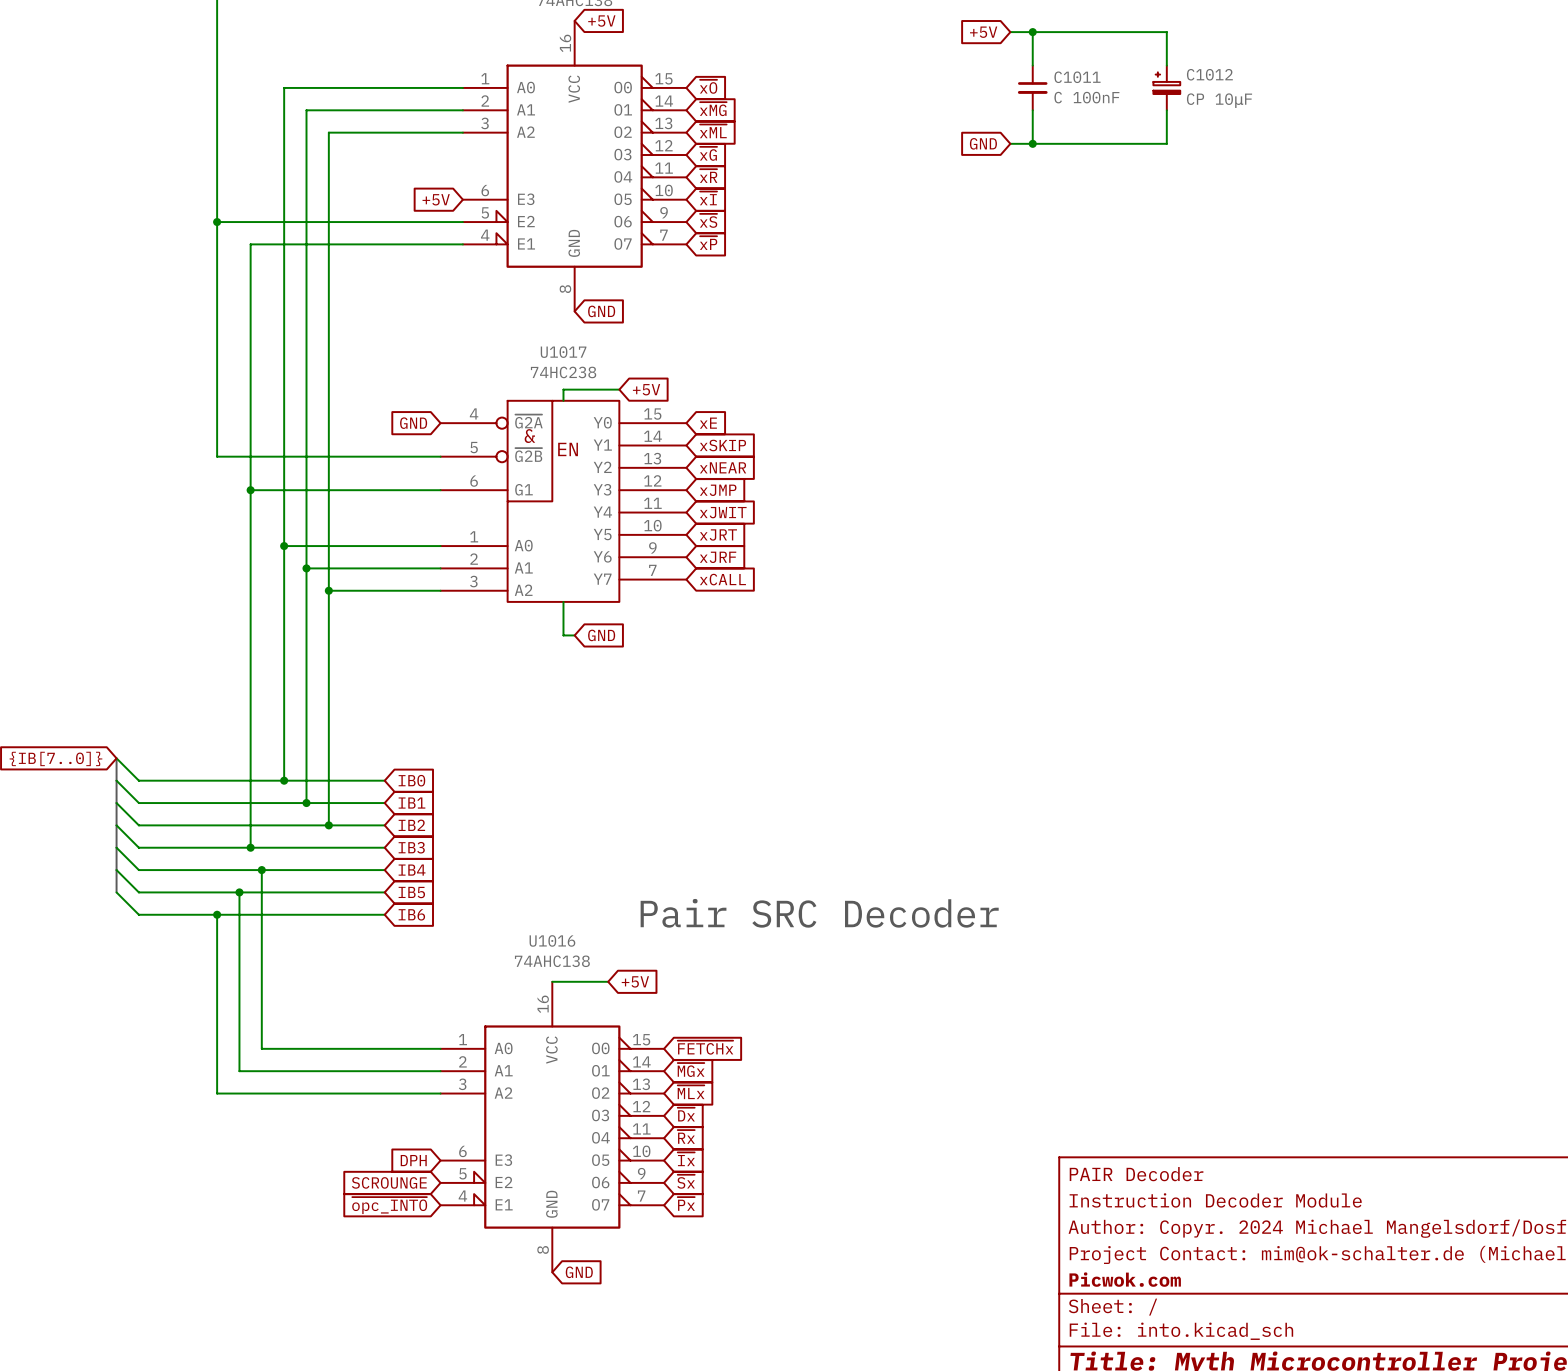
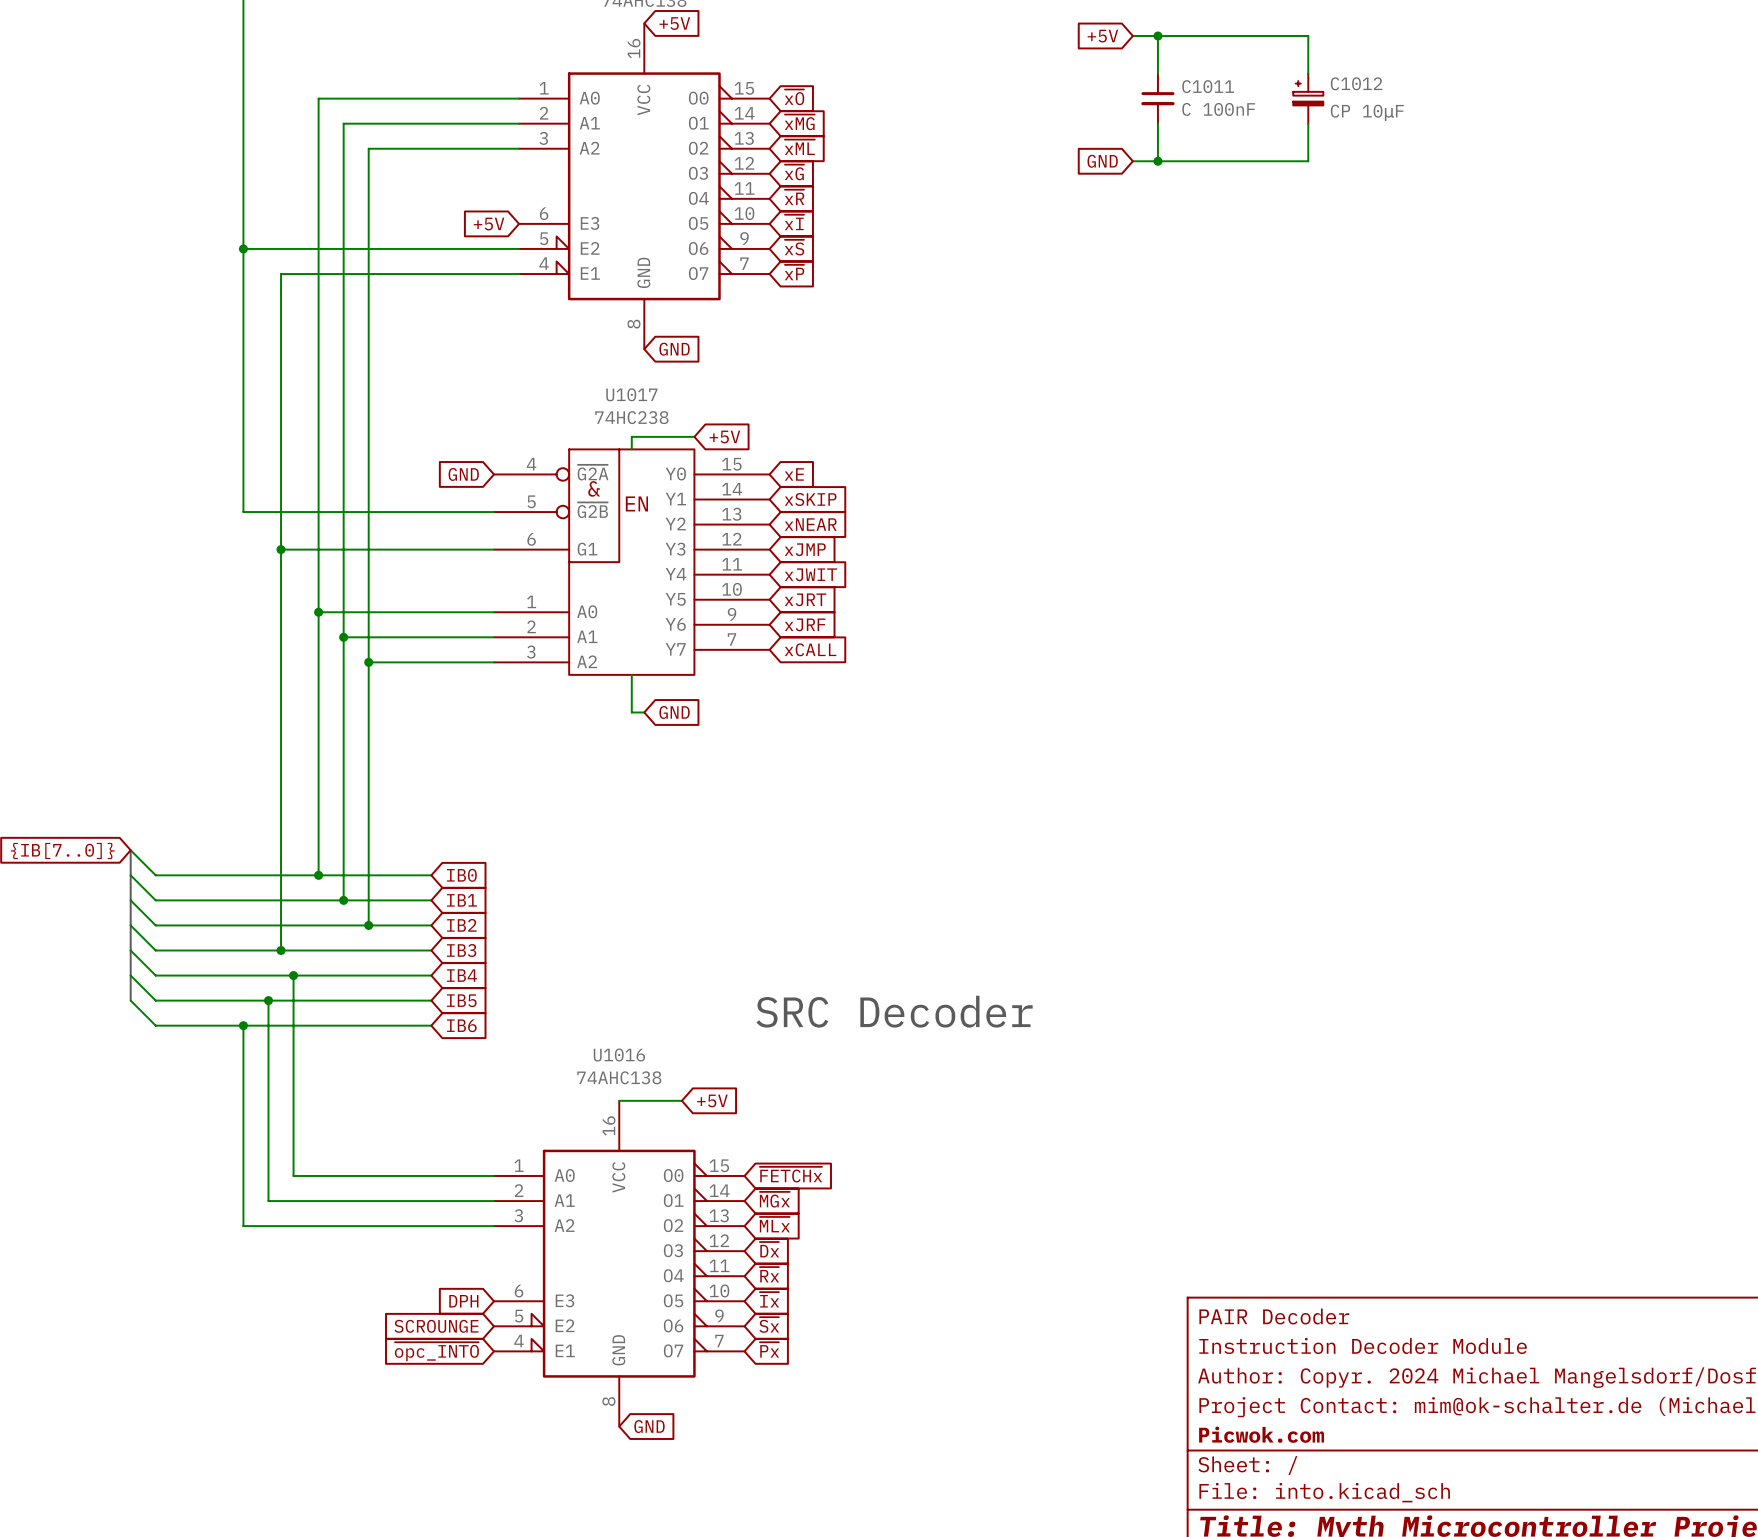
text: Pair SRC Decoder (819, 913) -> SRC Decoder (894, 1011)

